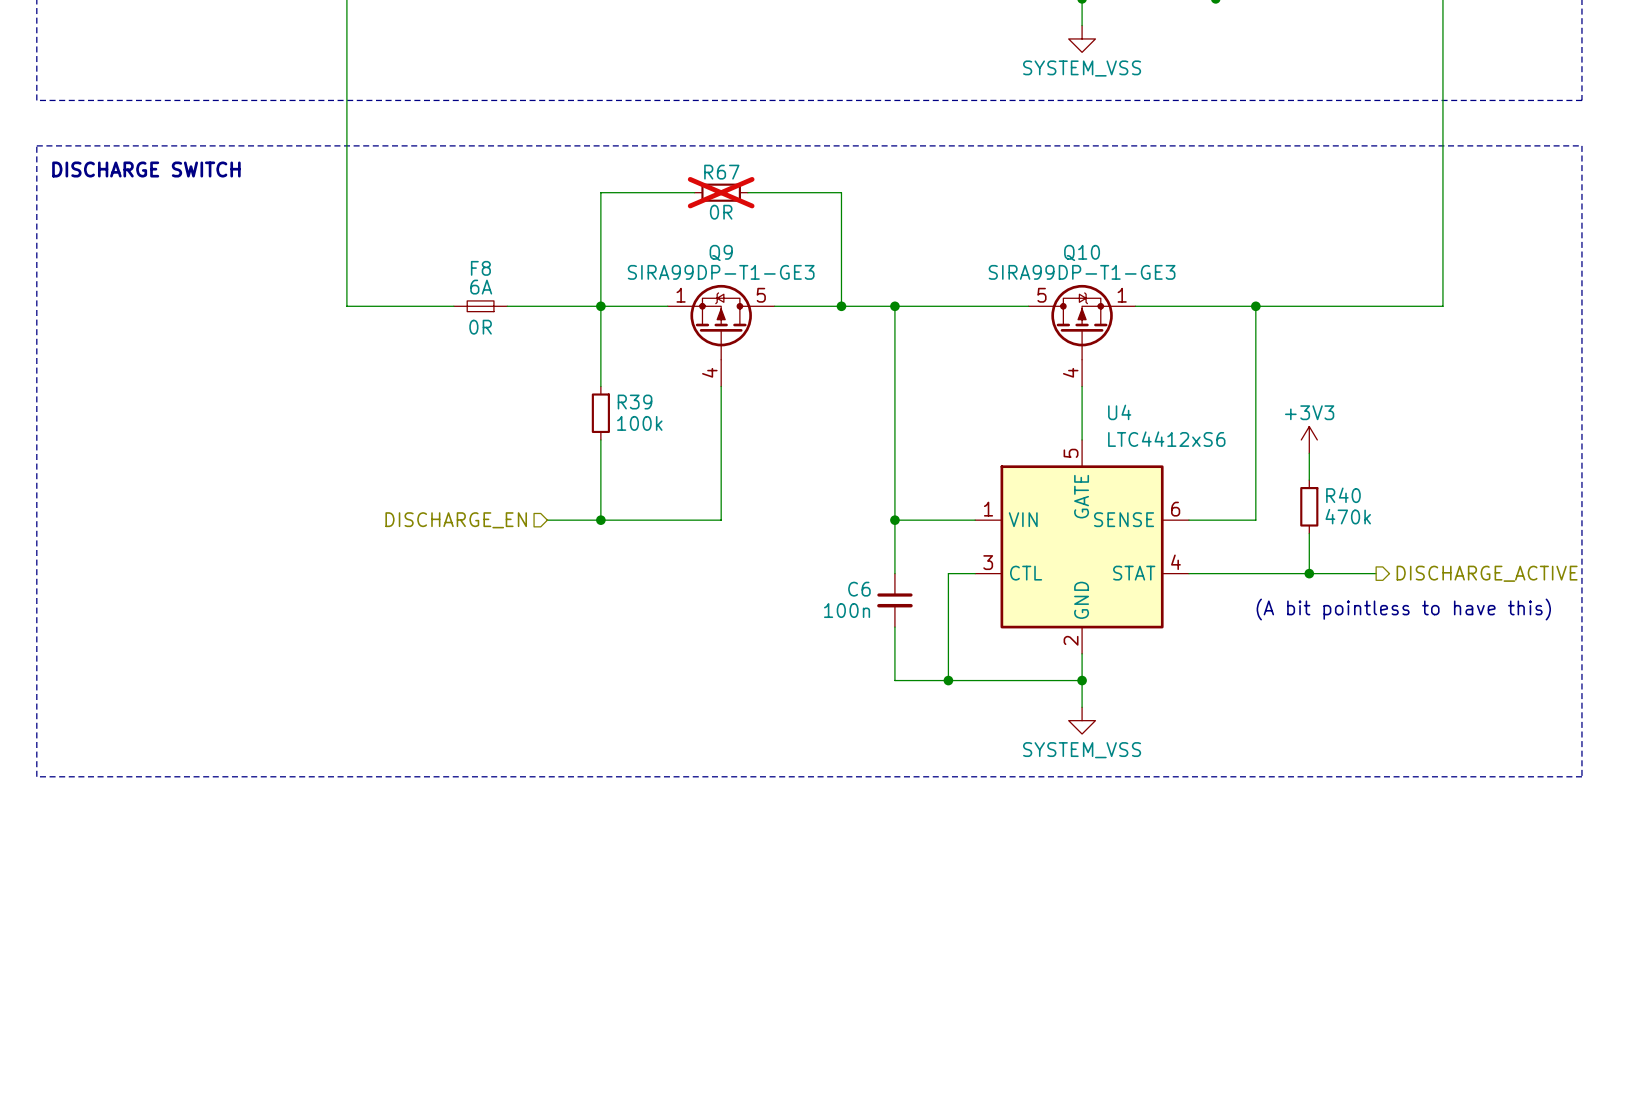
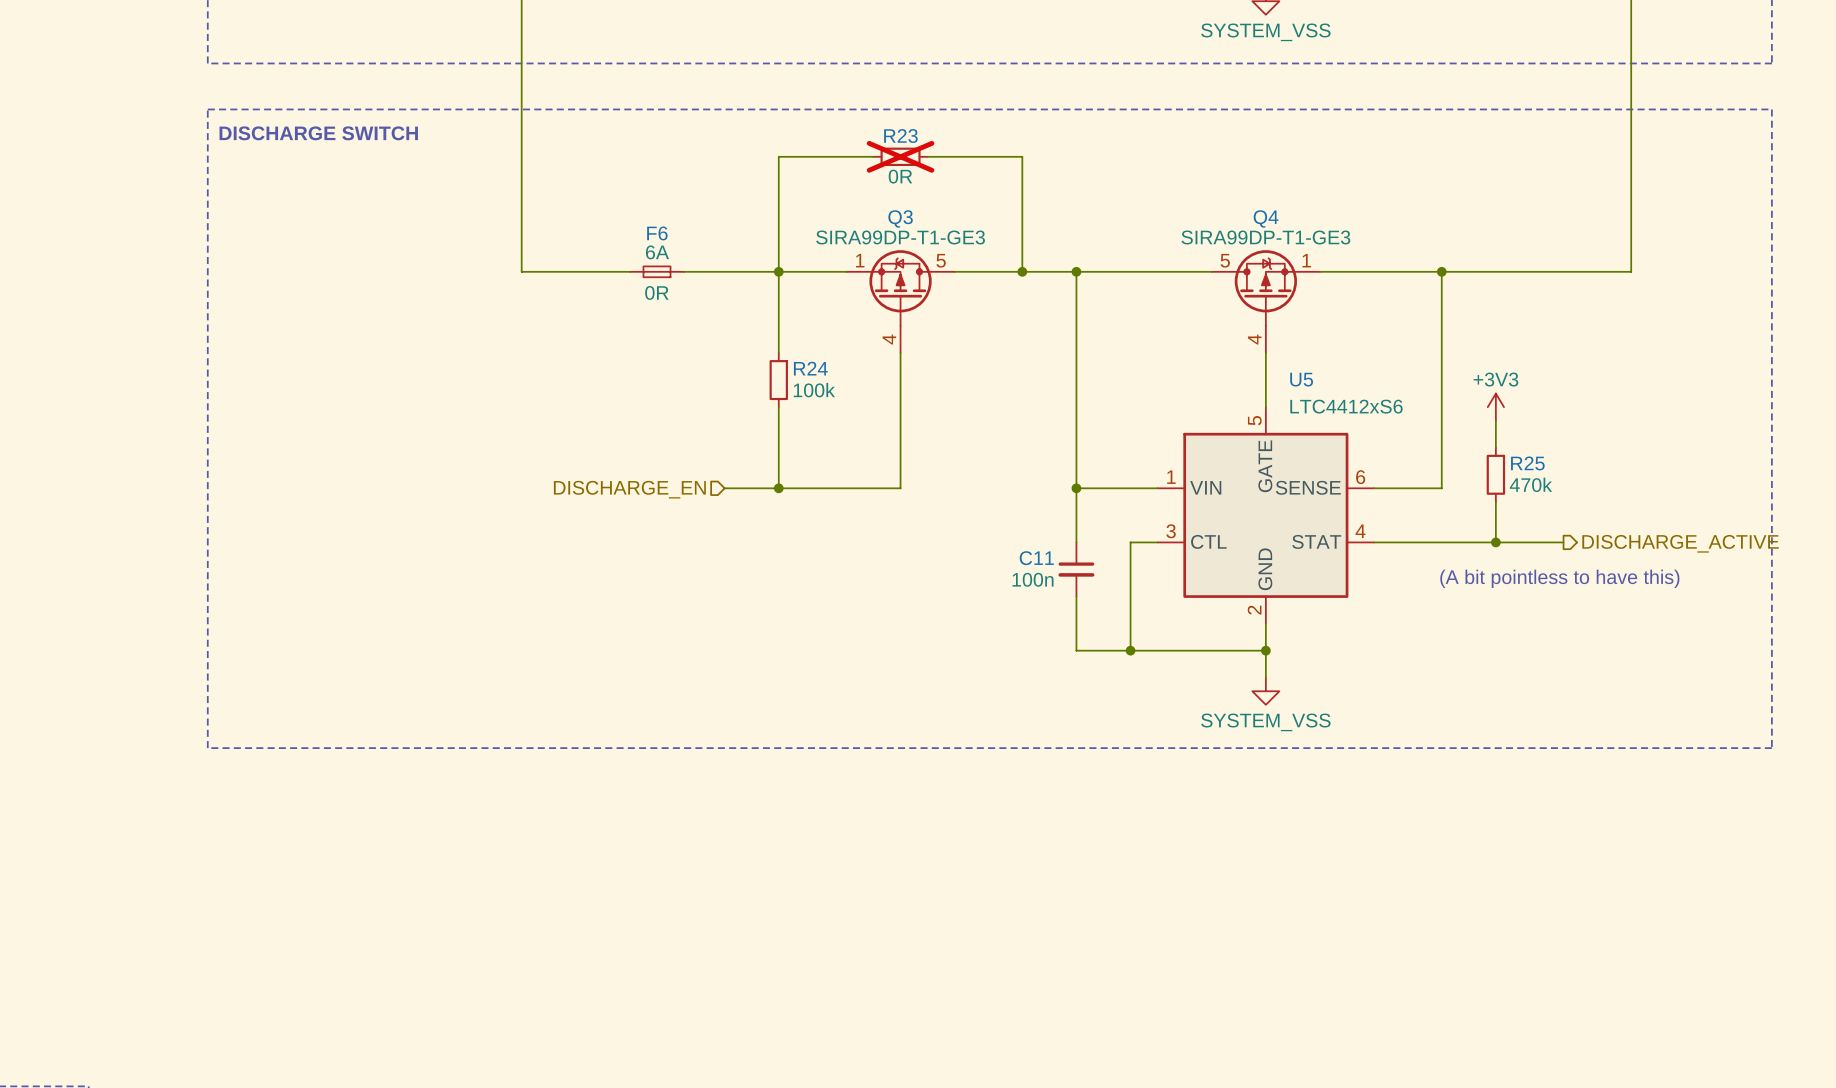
R67 name: R67 (721, 172) -> R23 (900, 136)
Q9 name: Q9 (721, 252) -> Q3 (900, 218)
Q10 name: Q10 (1082, 252) -> Q4 (1266, 218)
F8 name: F8 (480, 268) -> F6 (657, 233)
R39 name: R39 (635, 402) -> R24 (810, 368)
U4 name: U4 (1119, 412) -> U5 (1301, 379)
R40 name: R40 (1343, 495) -> R25 (1527, 463)
C6 name: C6 (859, 589) -> C11 (1036, 558)

